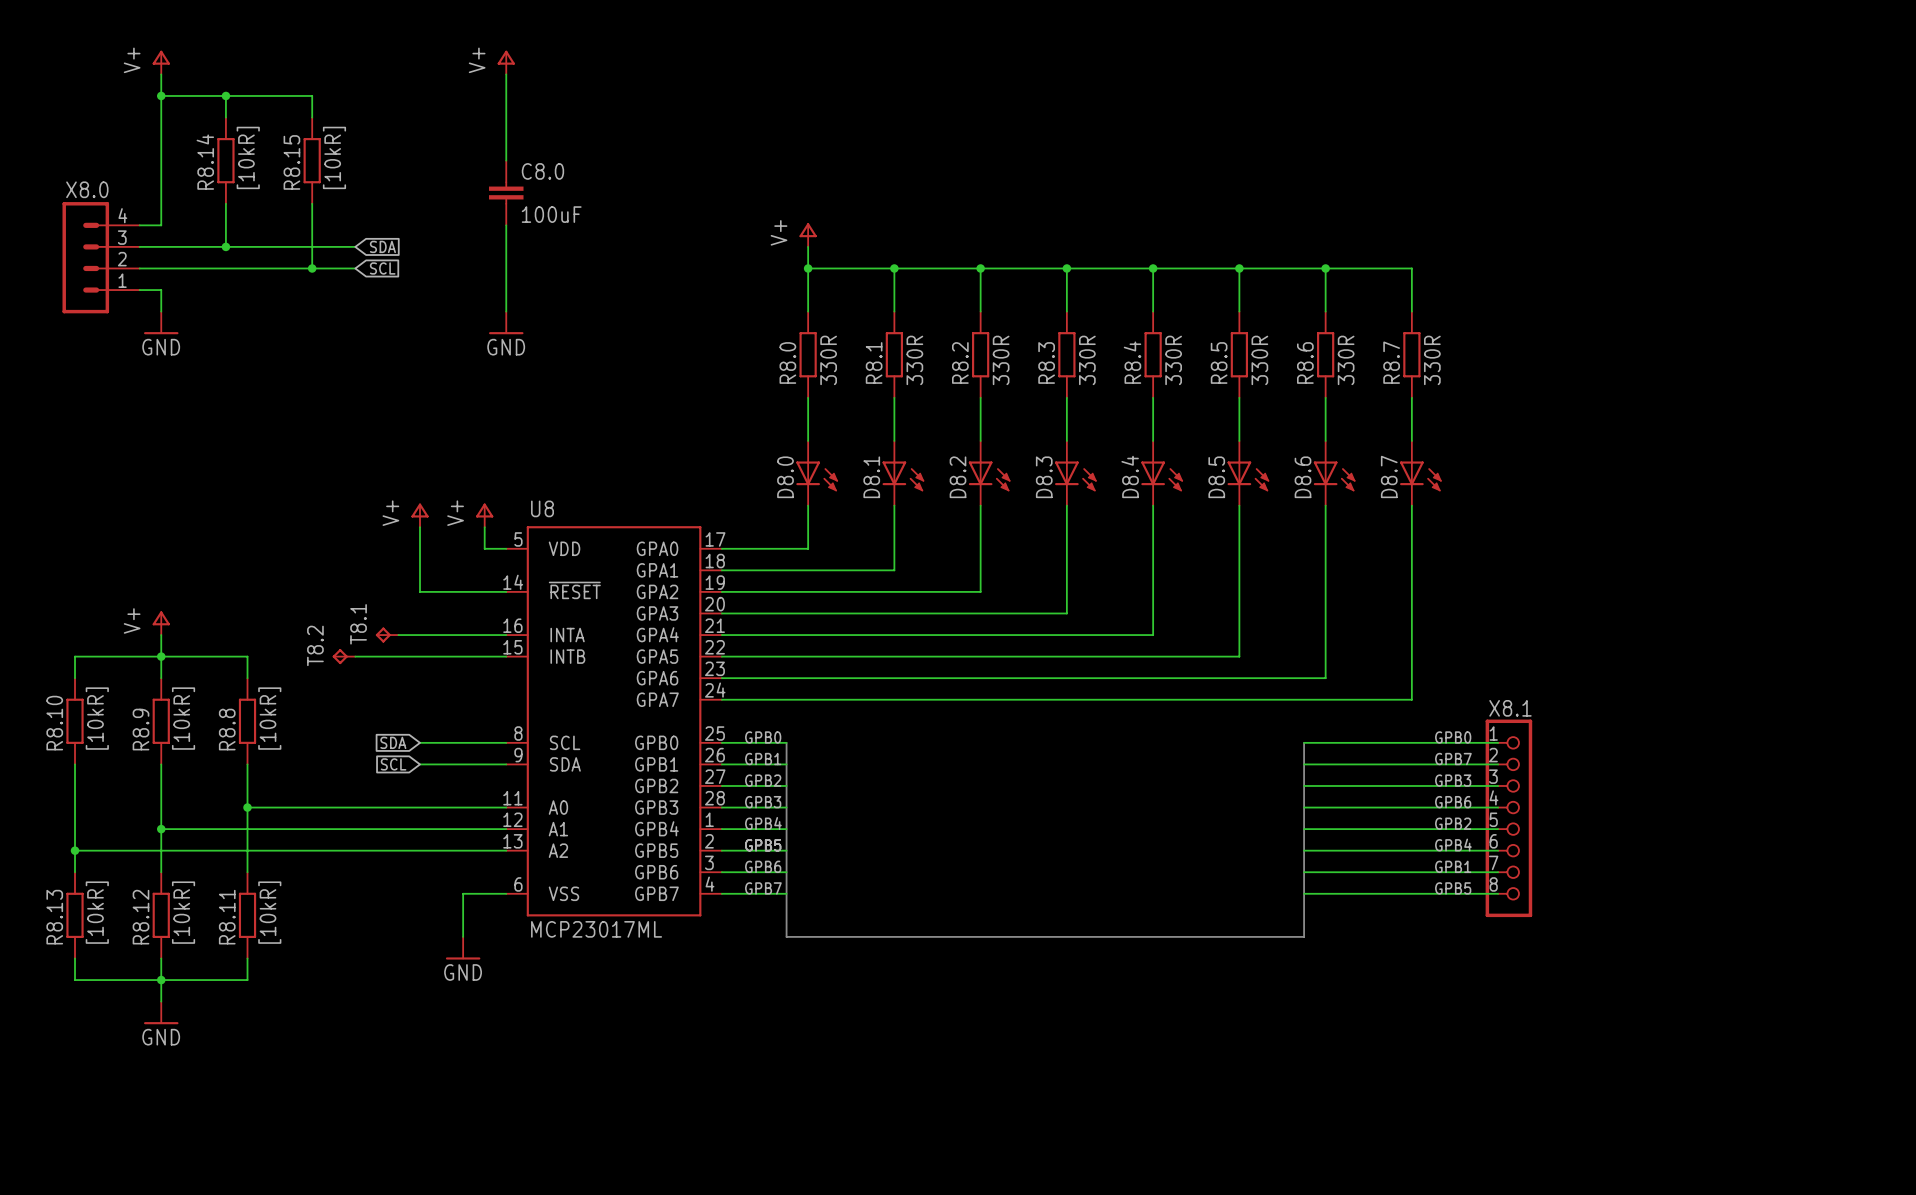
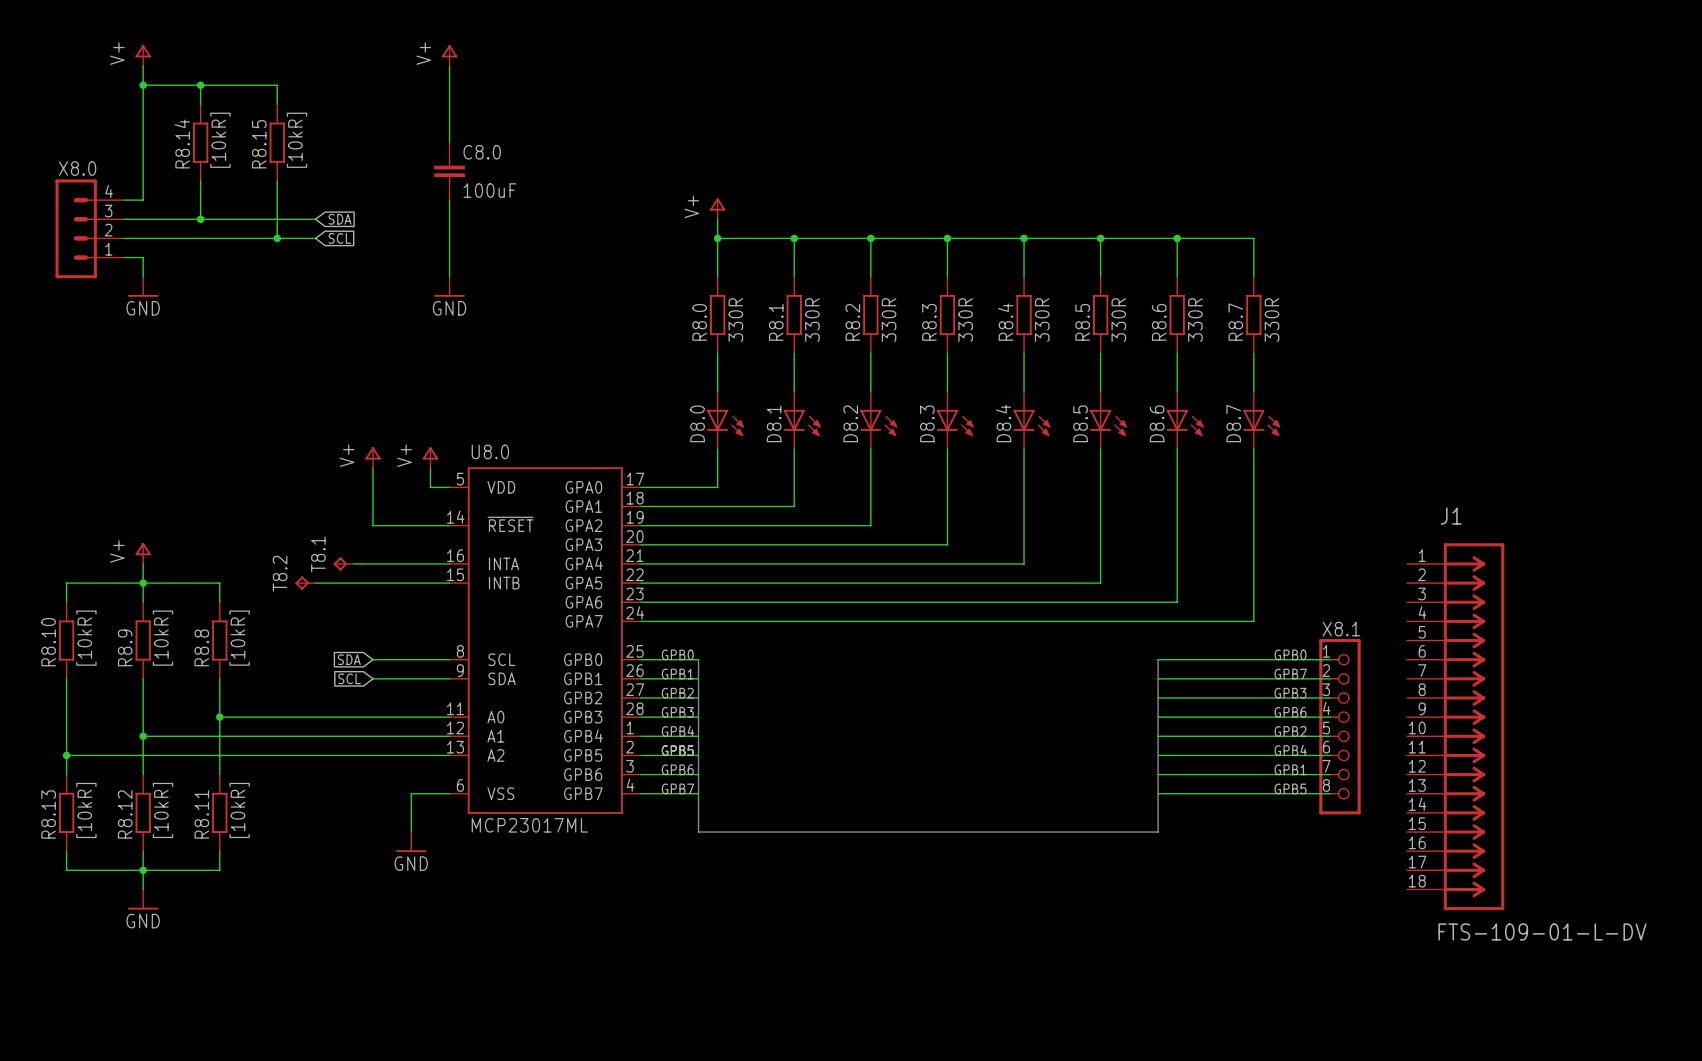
U8 name: U8 (542, 508) -> U8.0 (490, 451)
J1: none -> FTS-109-01-L-DV (1455, 726)

